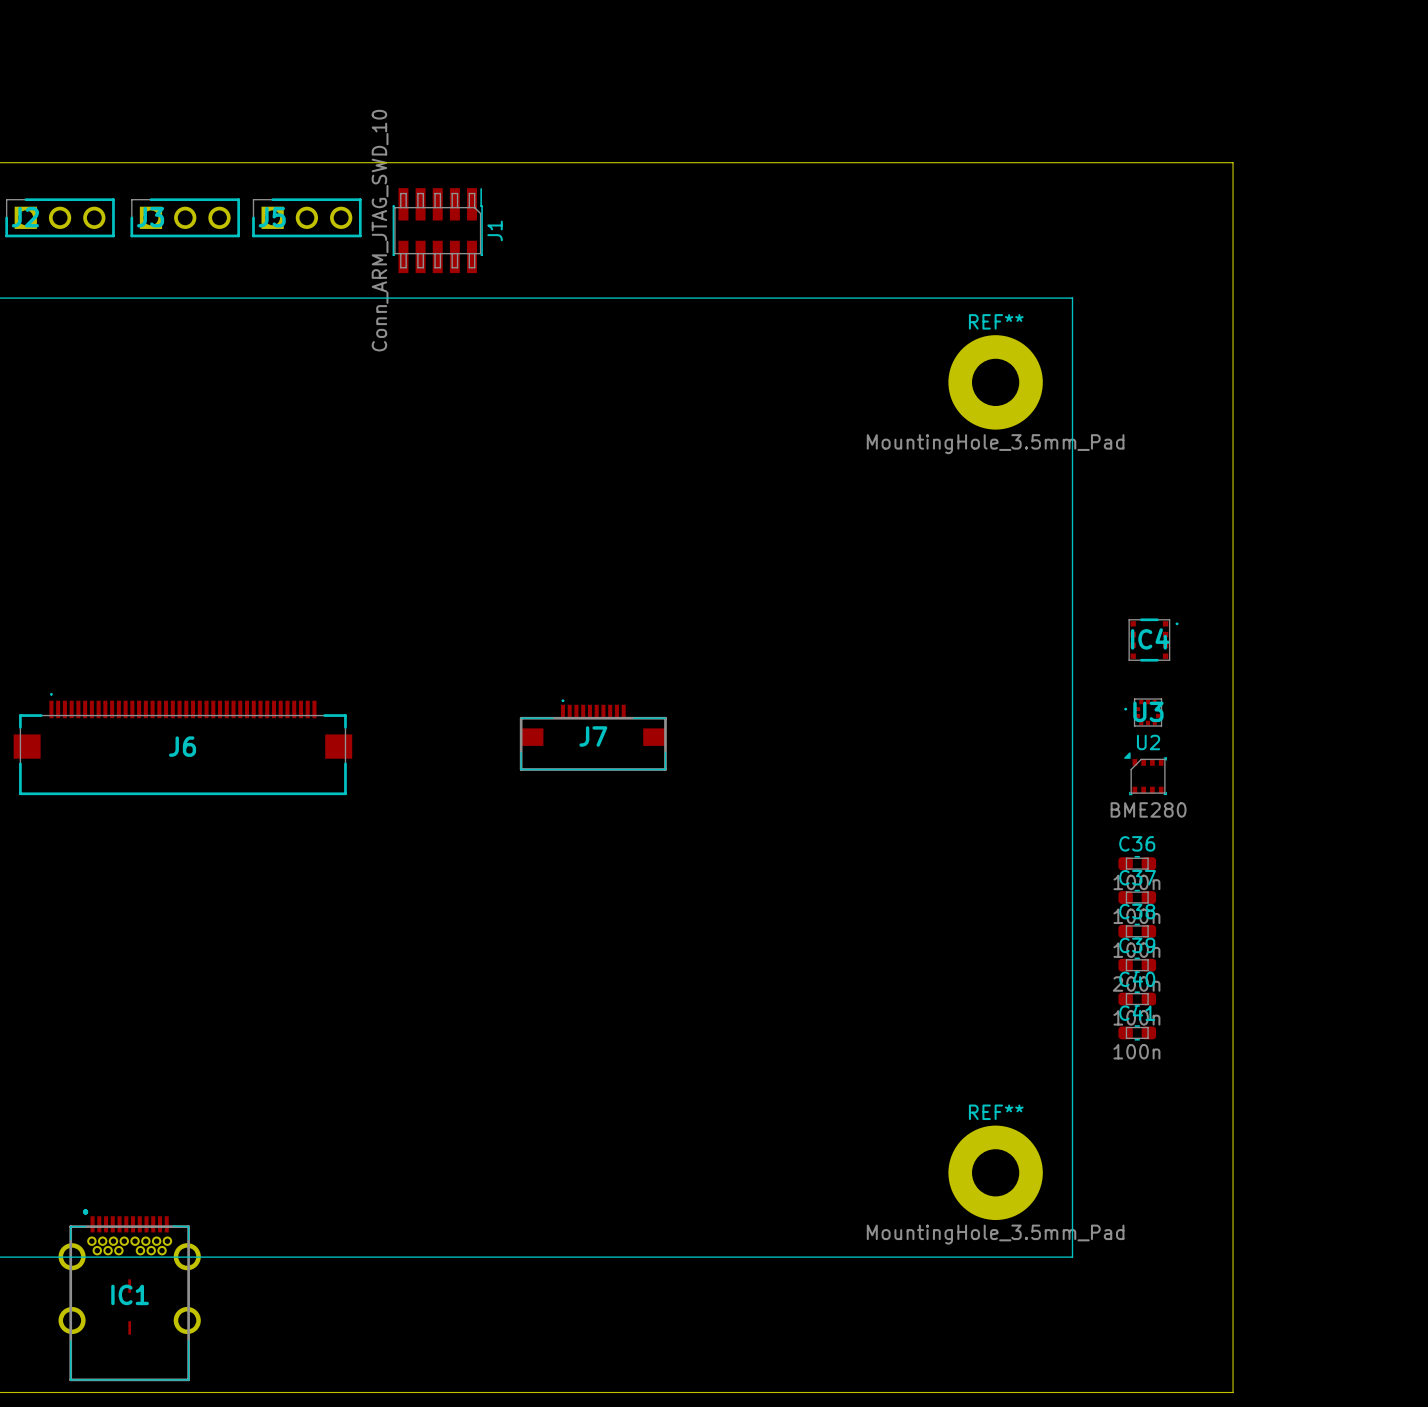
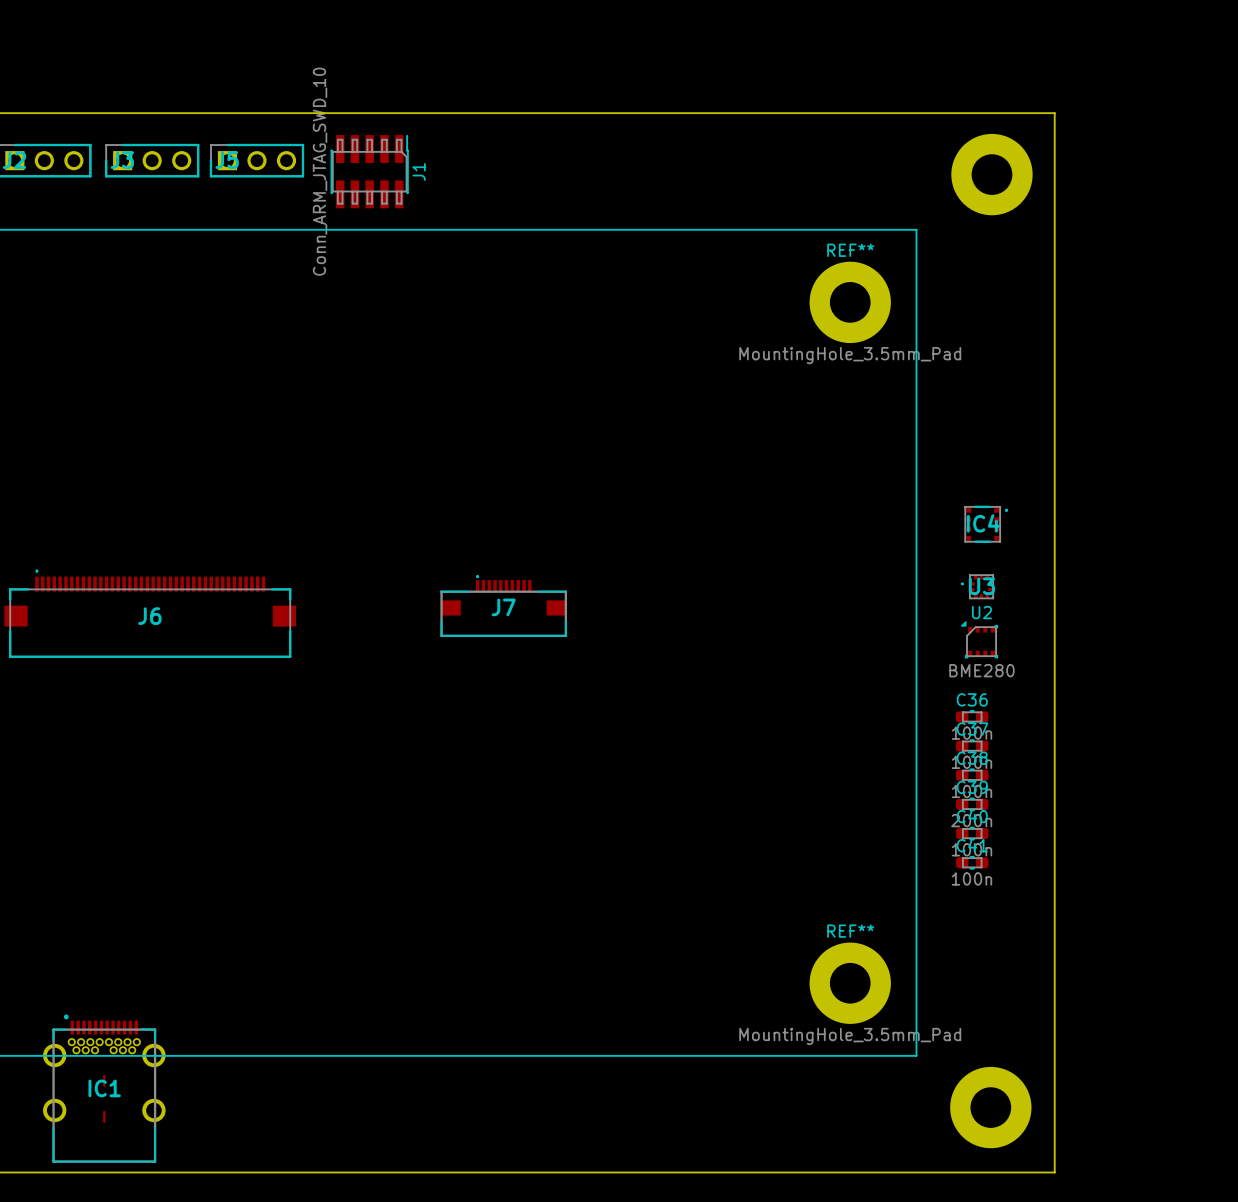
part: none -> (991, 174)
part: none -> (990, 1107)

